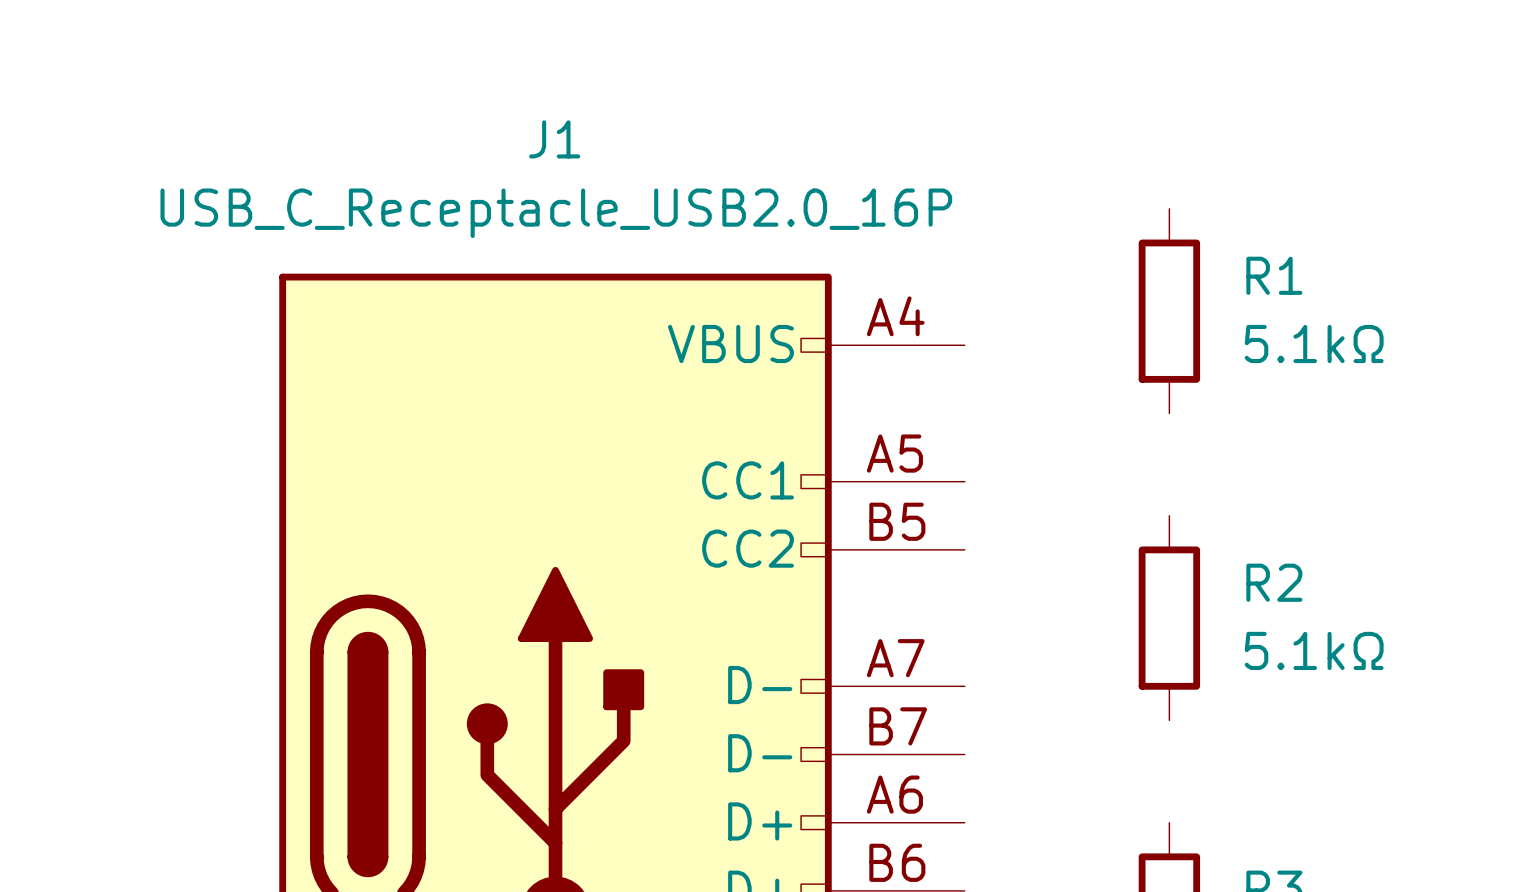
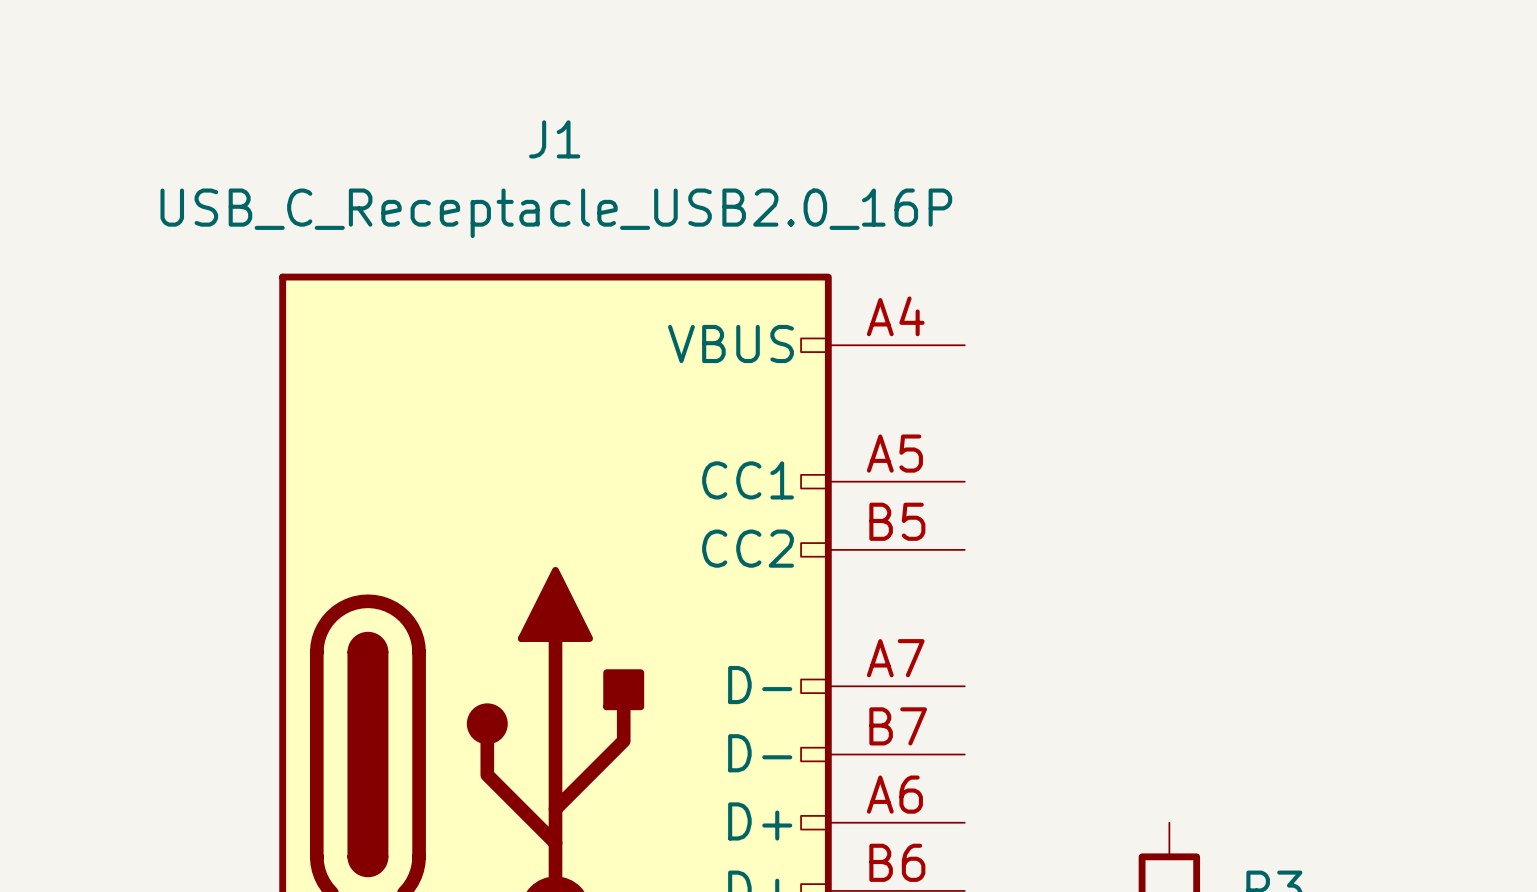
R1: 5.1kΩ (1169, 311) -> none
R2: 5.1kΩ (1169, 618) -> none

